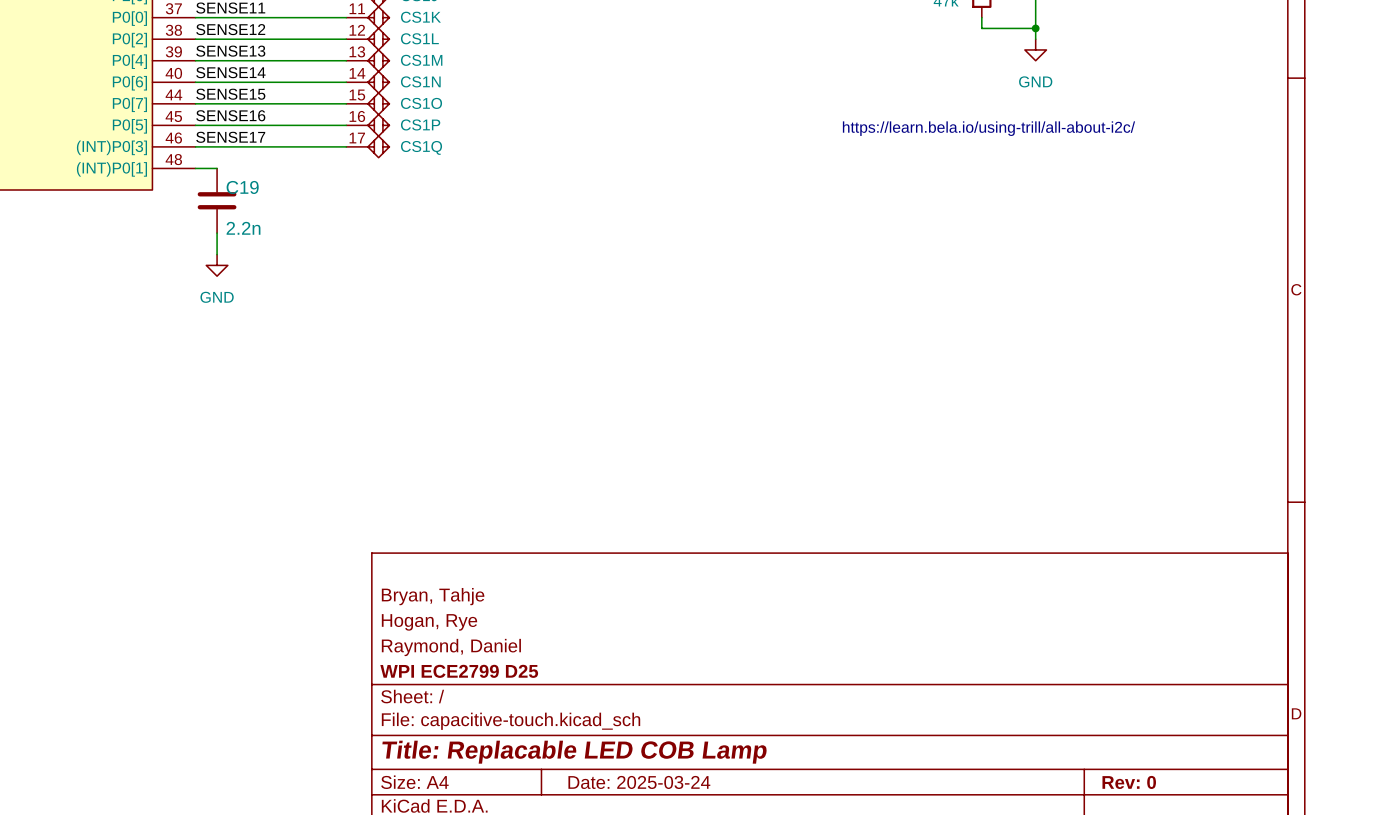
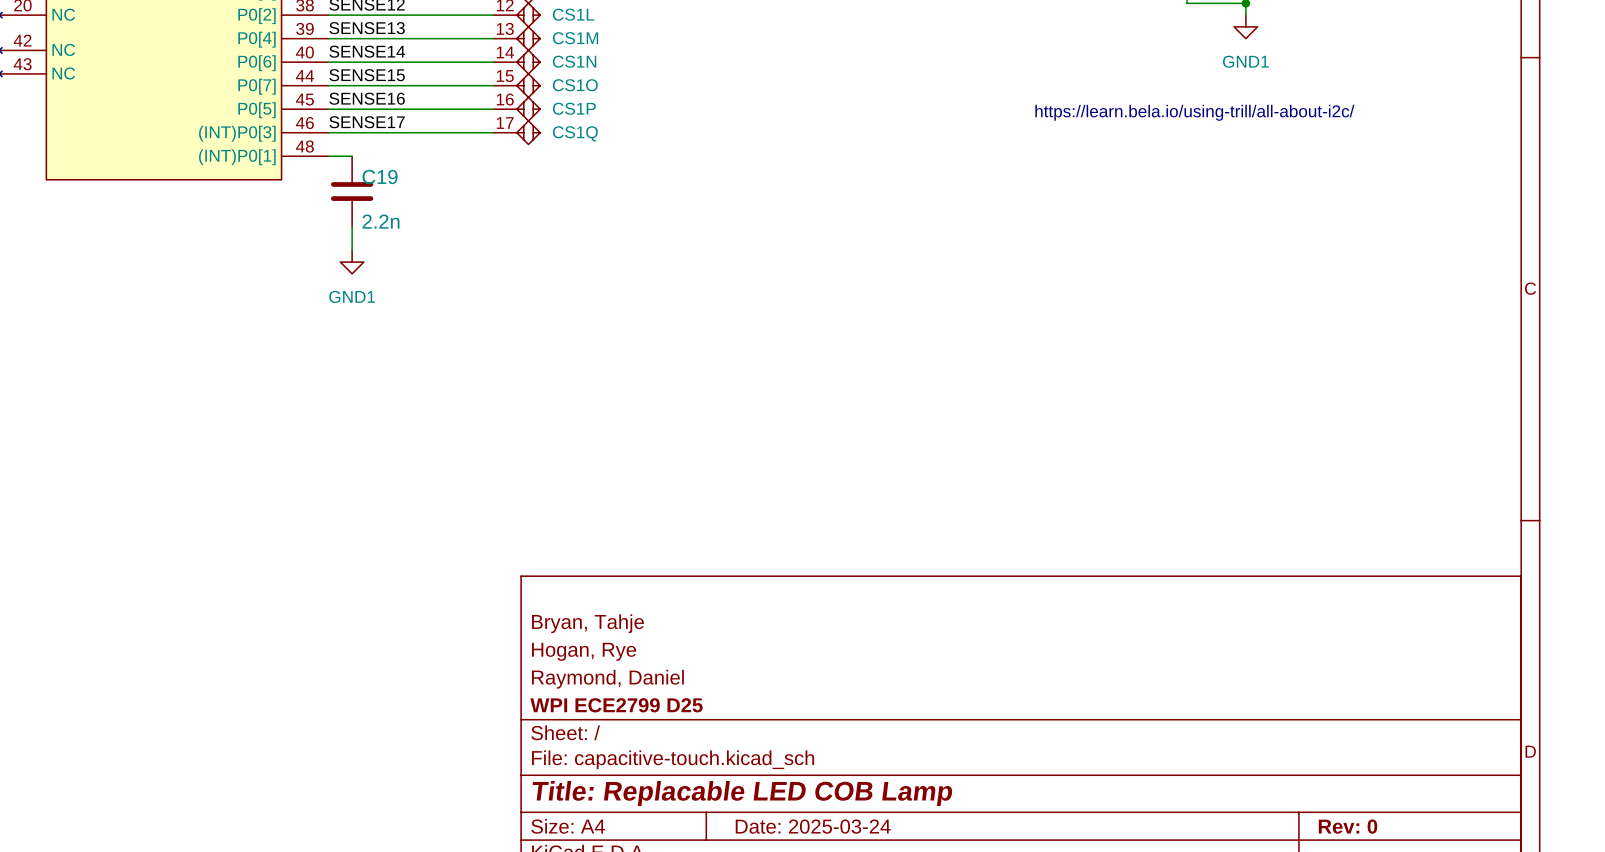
power symbol: GND (1035, 49) -> GND1 (1245, 26)
power symbol: GND (217, 265) -> GND1 (352, 262)

